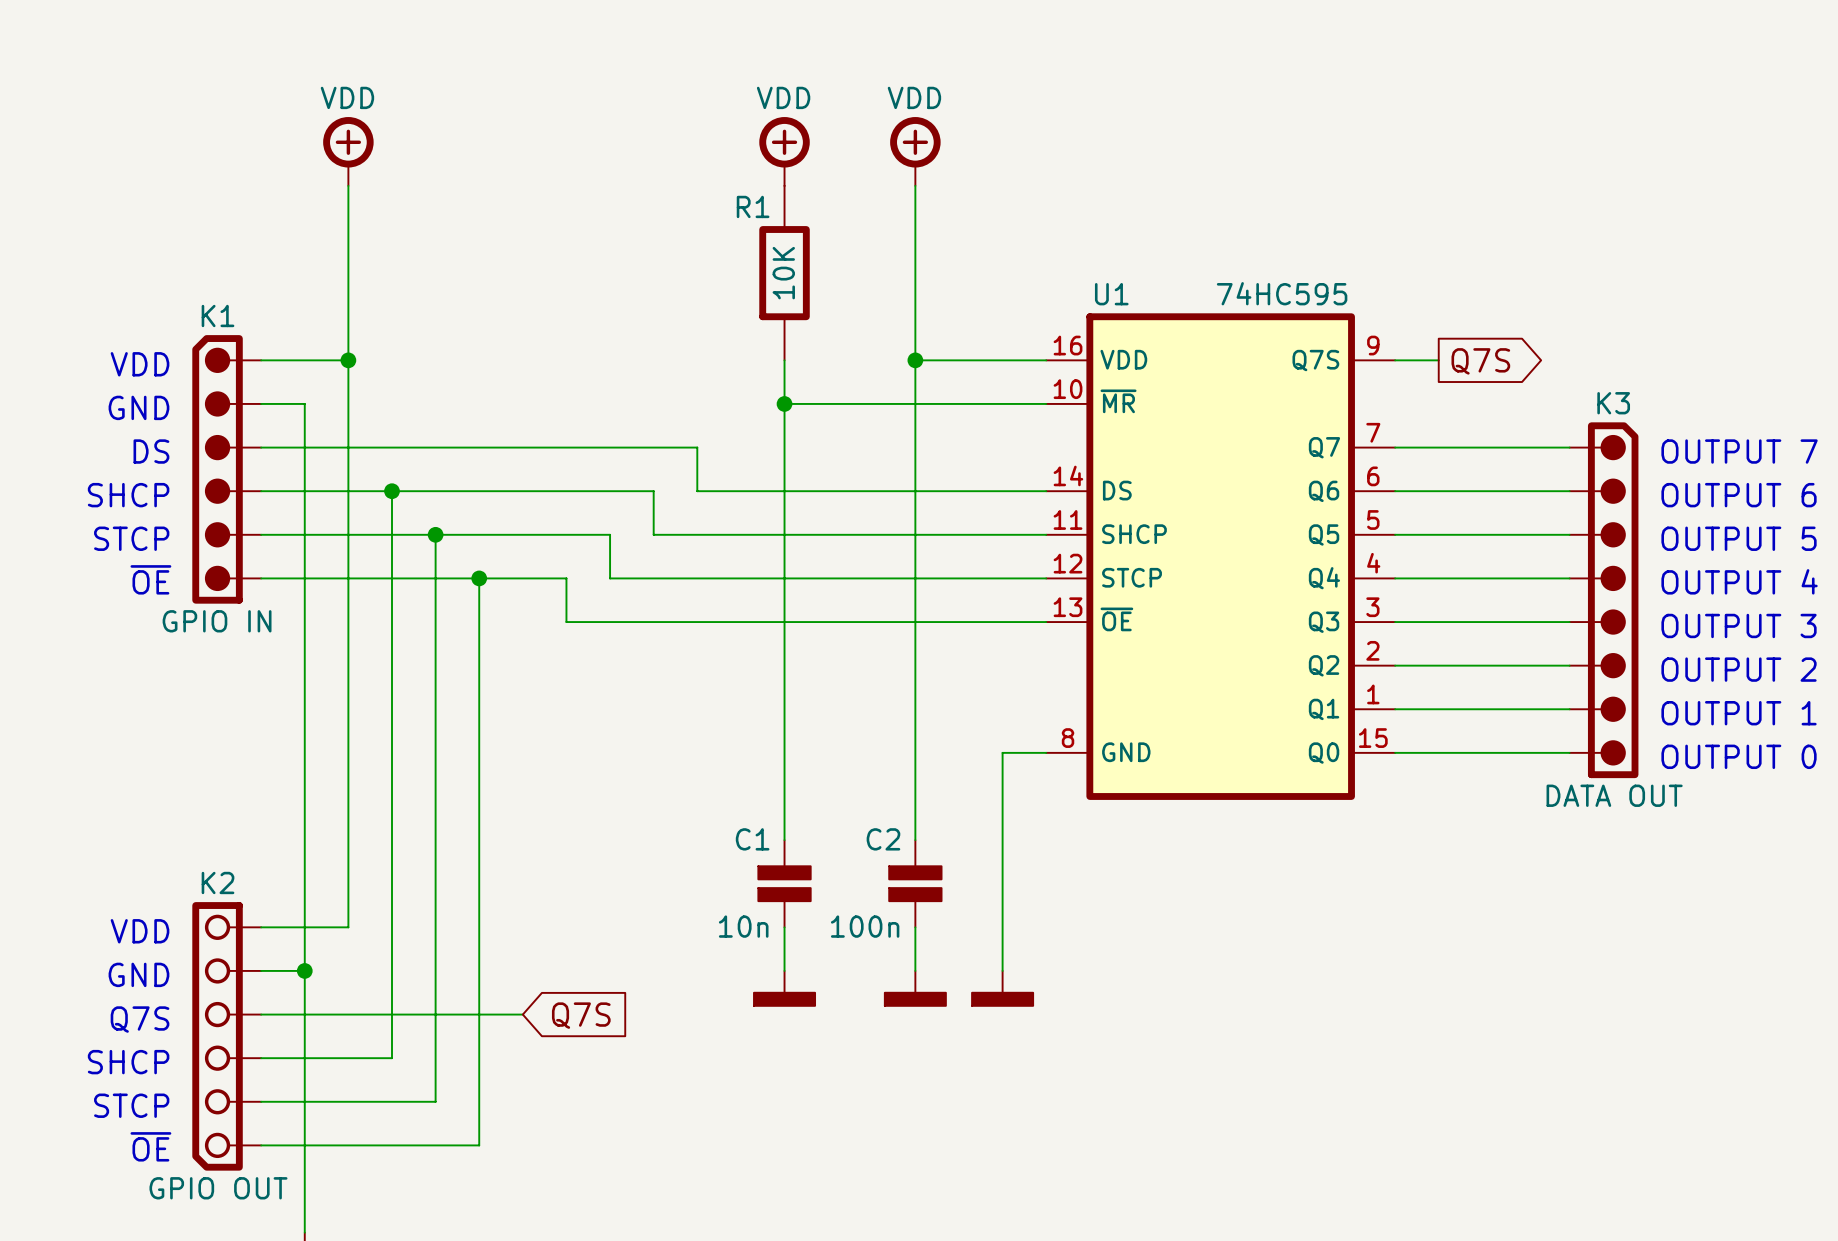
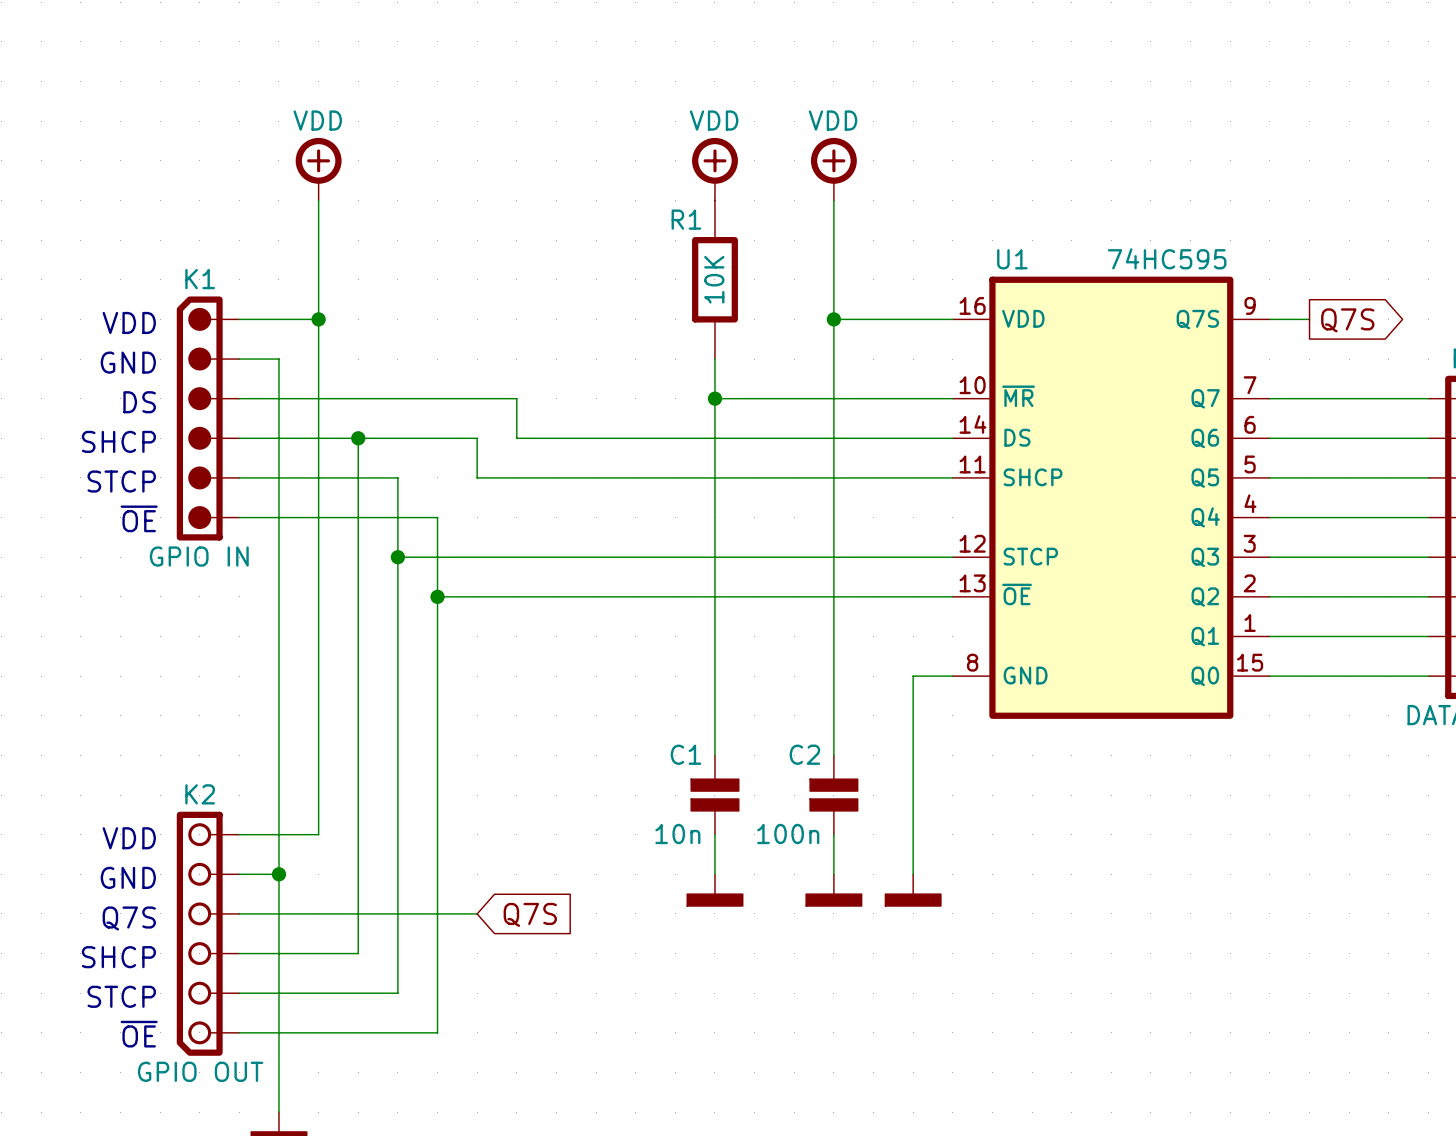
power symbol position: (348, 151) -> (318, 169)
power symbol position: (784, 151) -> (714, 169)
power symbol position: (915, 151) -> (833, 169)
R1 position: (784, 273) -> (714, 279)
U1 symbol: [1046, 313, 1396, 800] -> [952, 276, 1270, 719]
wire: (784, 360) (784, 403) (1046, 403) -> none
junction position: (784, 403) -> (714, 398)
wire: (566, 447) (697, 447) (697, 491) -> (516, 398) (516, 438)
wire: none -> (714, 398) (952, 398)
wire: (522, 491) (566, 491) -> (477, 438) (477, 477)
wire: (653, 491) (653, 534) -> (596, 438) (635, 438)
wire: (435, 534) (522, 534) -> none
junction: (435, 534) -> none
wire: (610, 534) (610, 578) (1046, 578) -> (556, 477) (596, 477)
wire: (479, 578) (566, 578) (566, 622) -> (397, 557) (516, 557)
junction: (479, 578) -> none
junction: none -> (397, 557)
wire: none -> (437, 596) (952, 596)
junction: none -> (437, 596)

